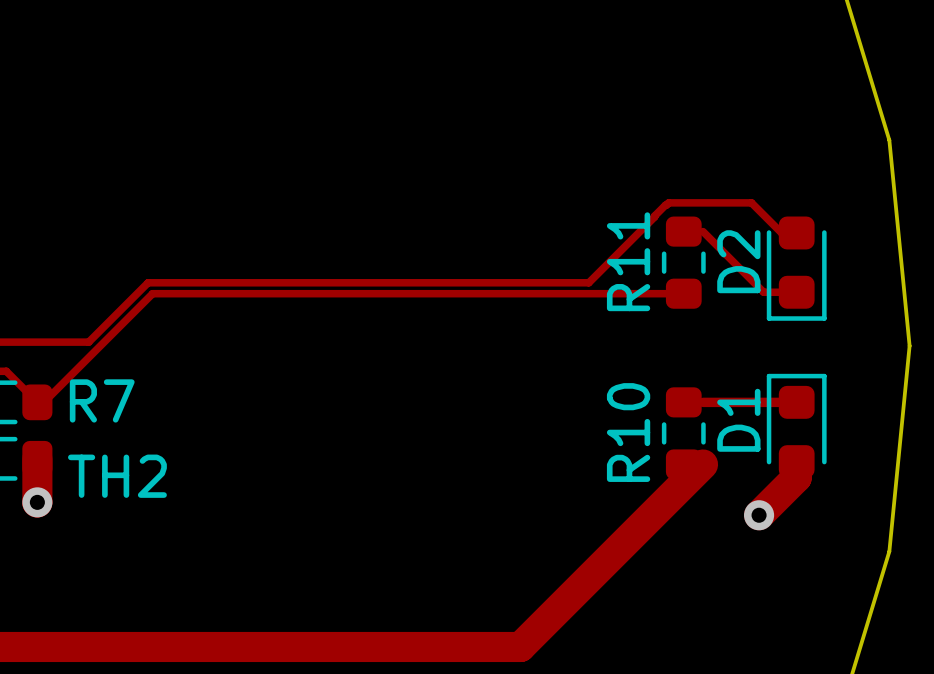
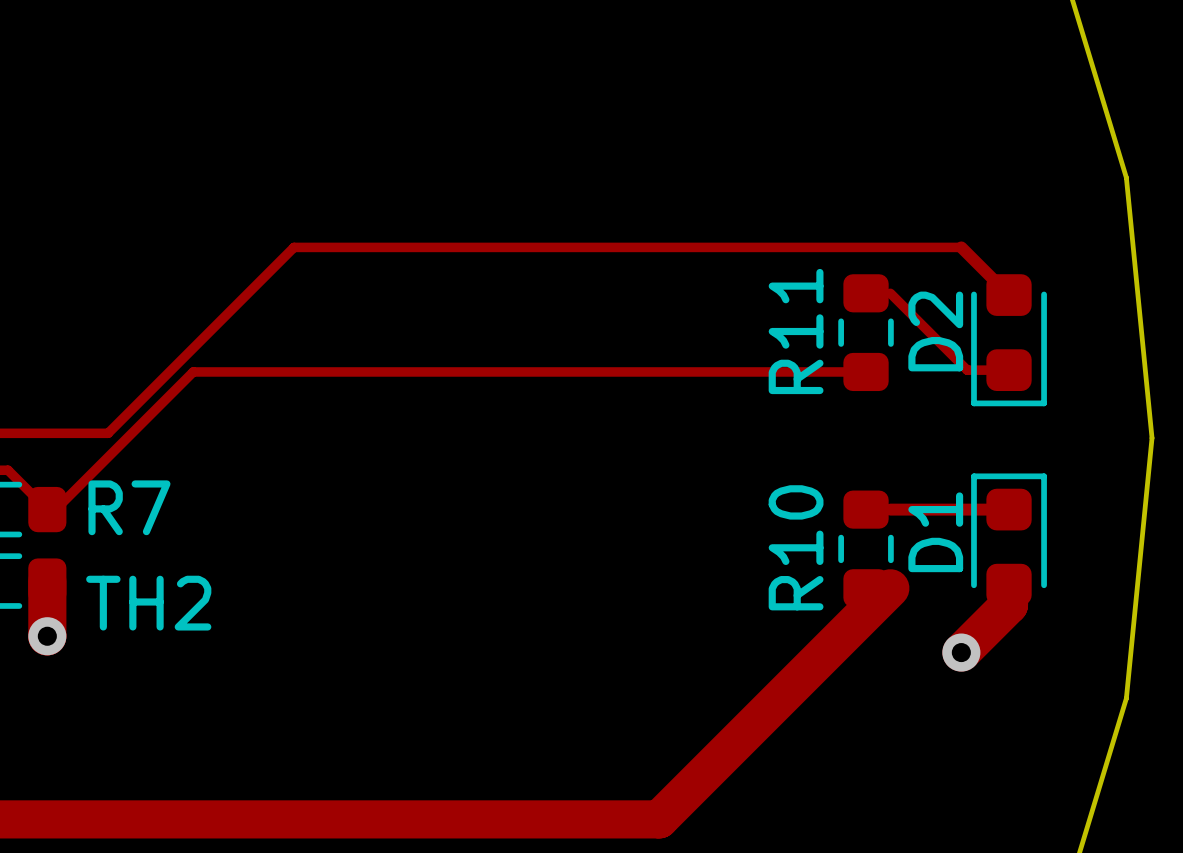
track: (796, 232) (781, 232) (751, 202) (668, 202) (588, 282) (148, 282) (88, 342) (85, 342) -> (1009, 295) (961, 247) (294, 247) (108, 433)

